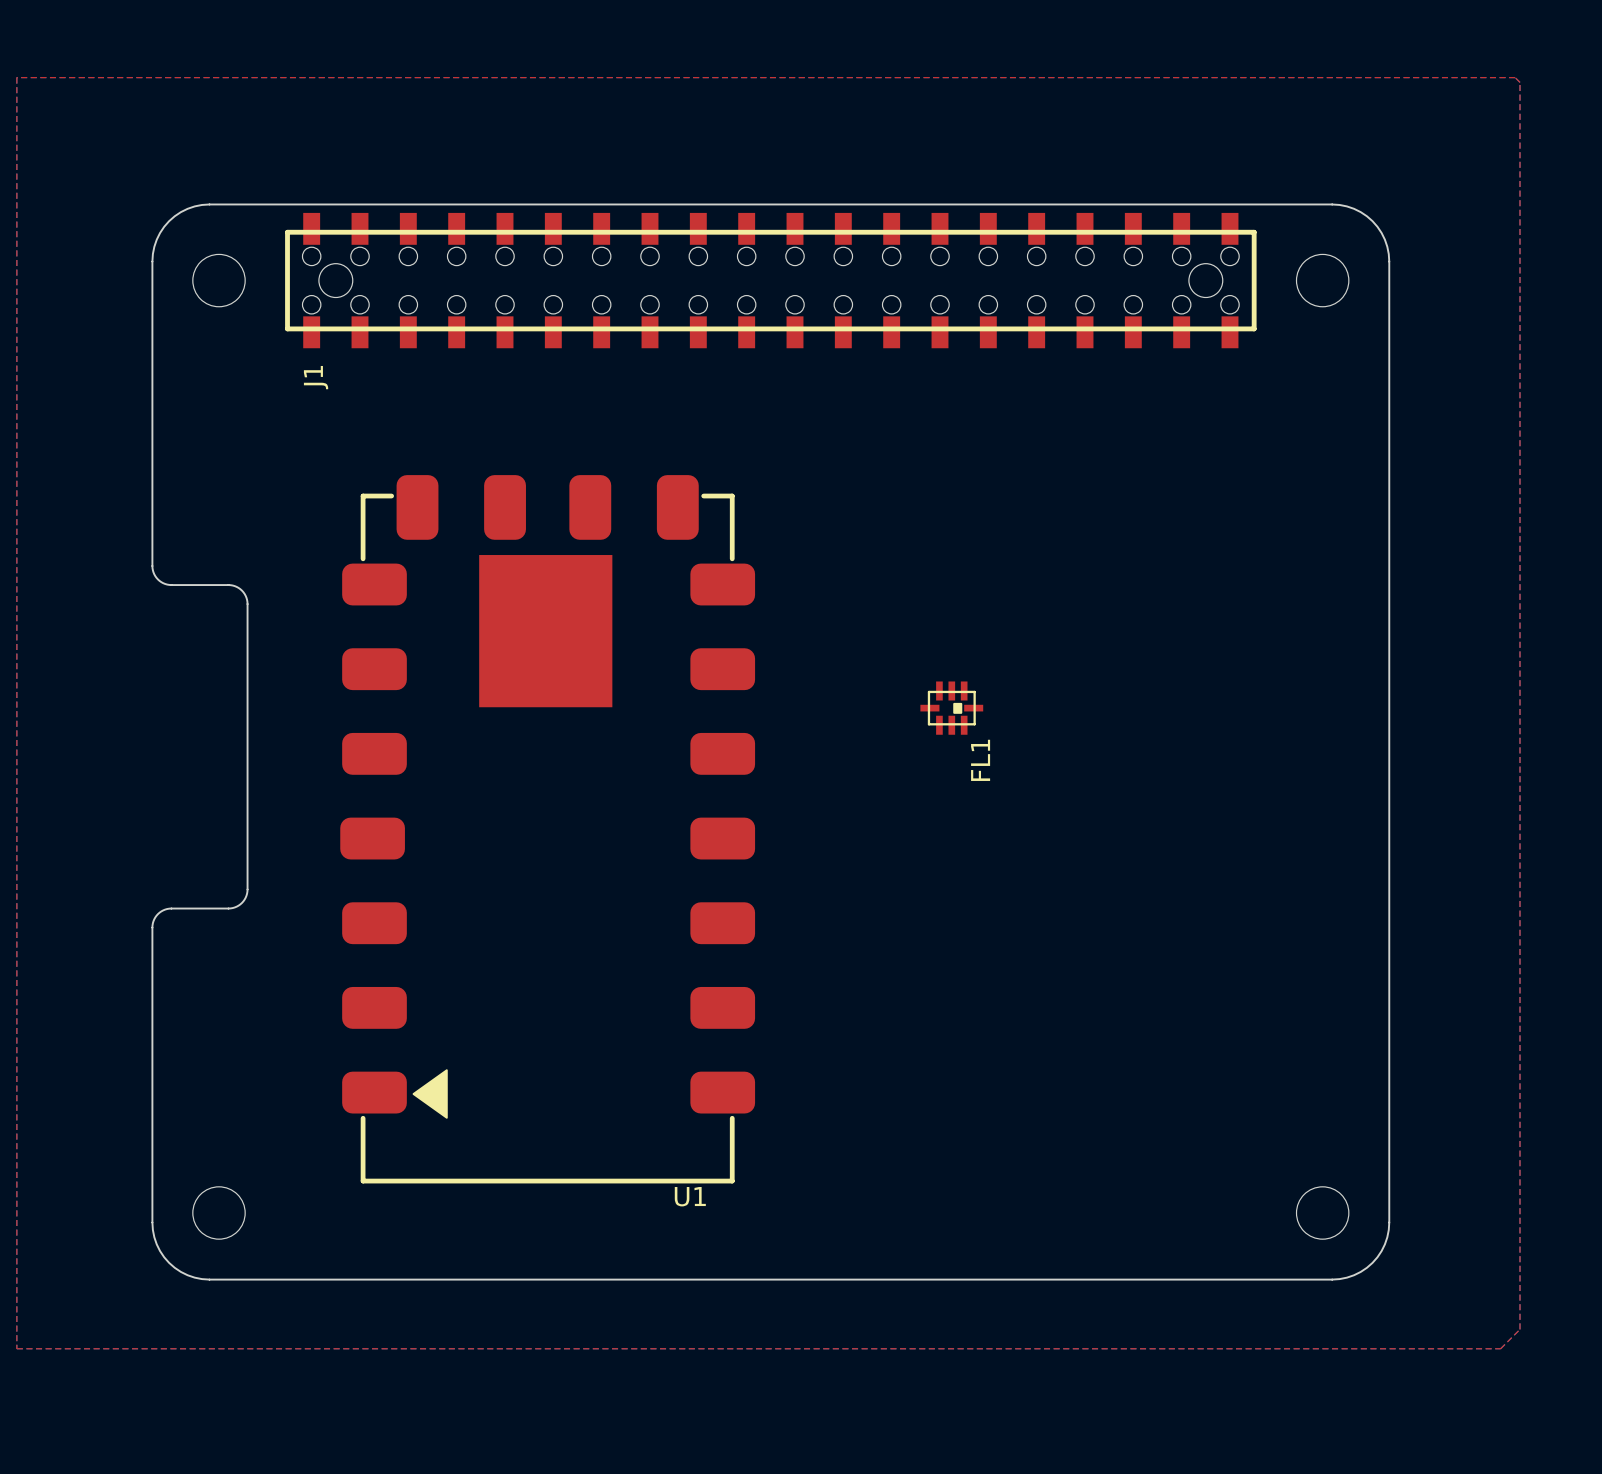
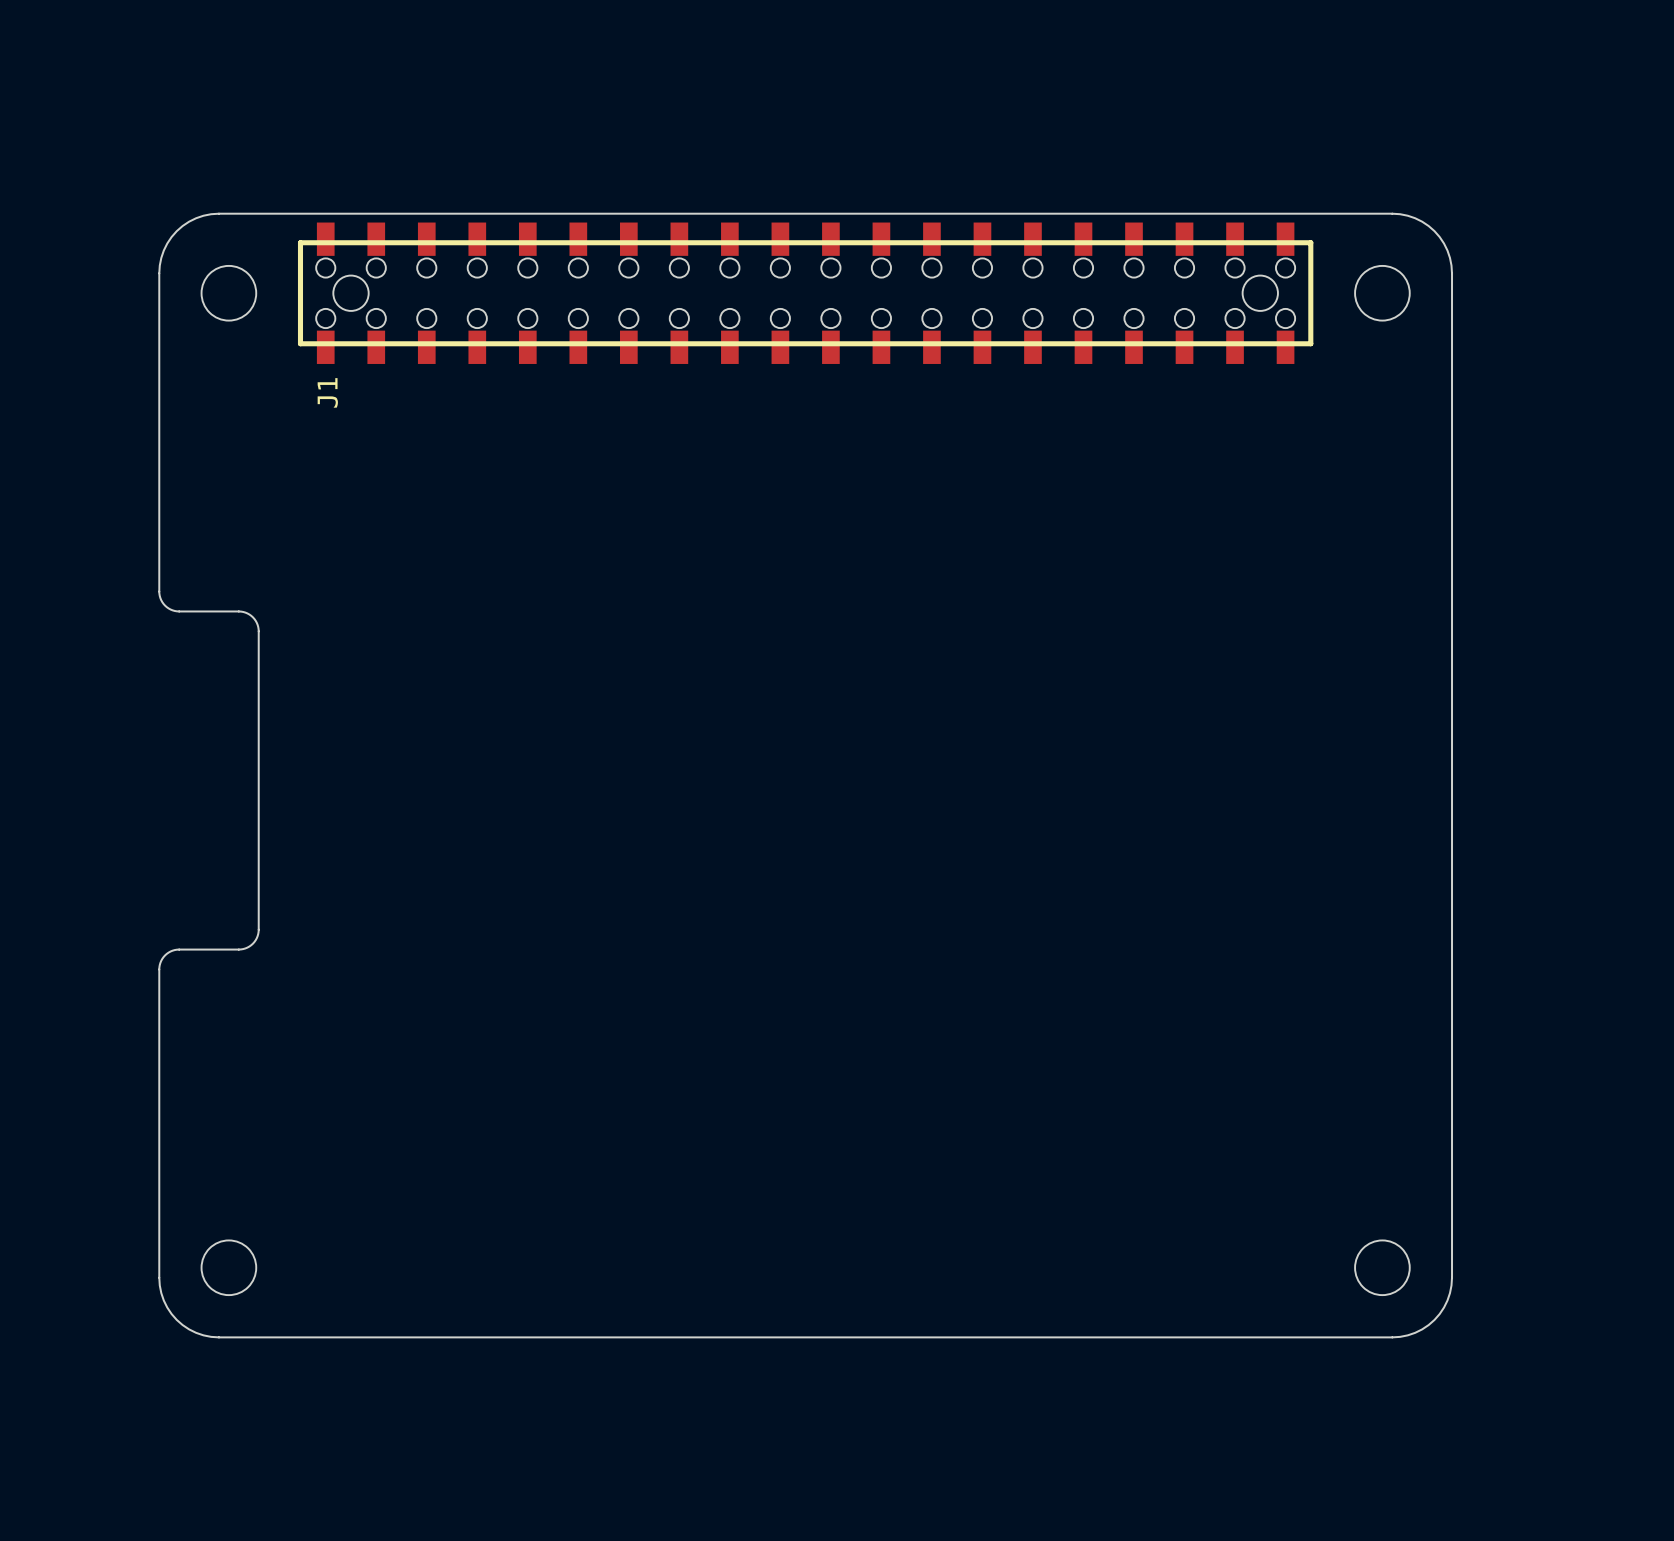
top zone outline: (16, 77) (1515, 77) (1520, 82) (1520, 1329) (1500, 1348) (16, 1348) (16, 77) -> none
FL1: (951, 708) -> none
U1: (547, 829) -> none

